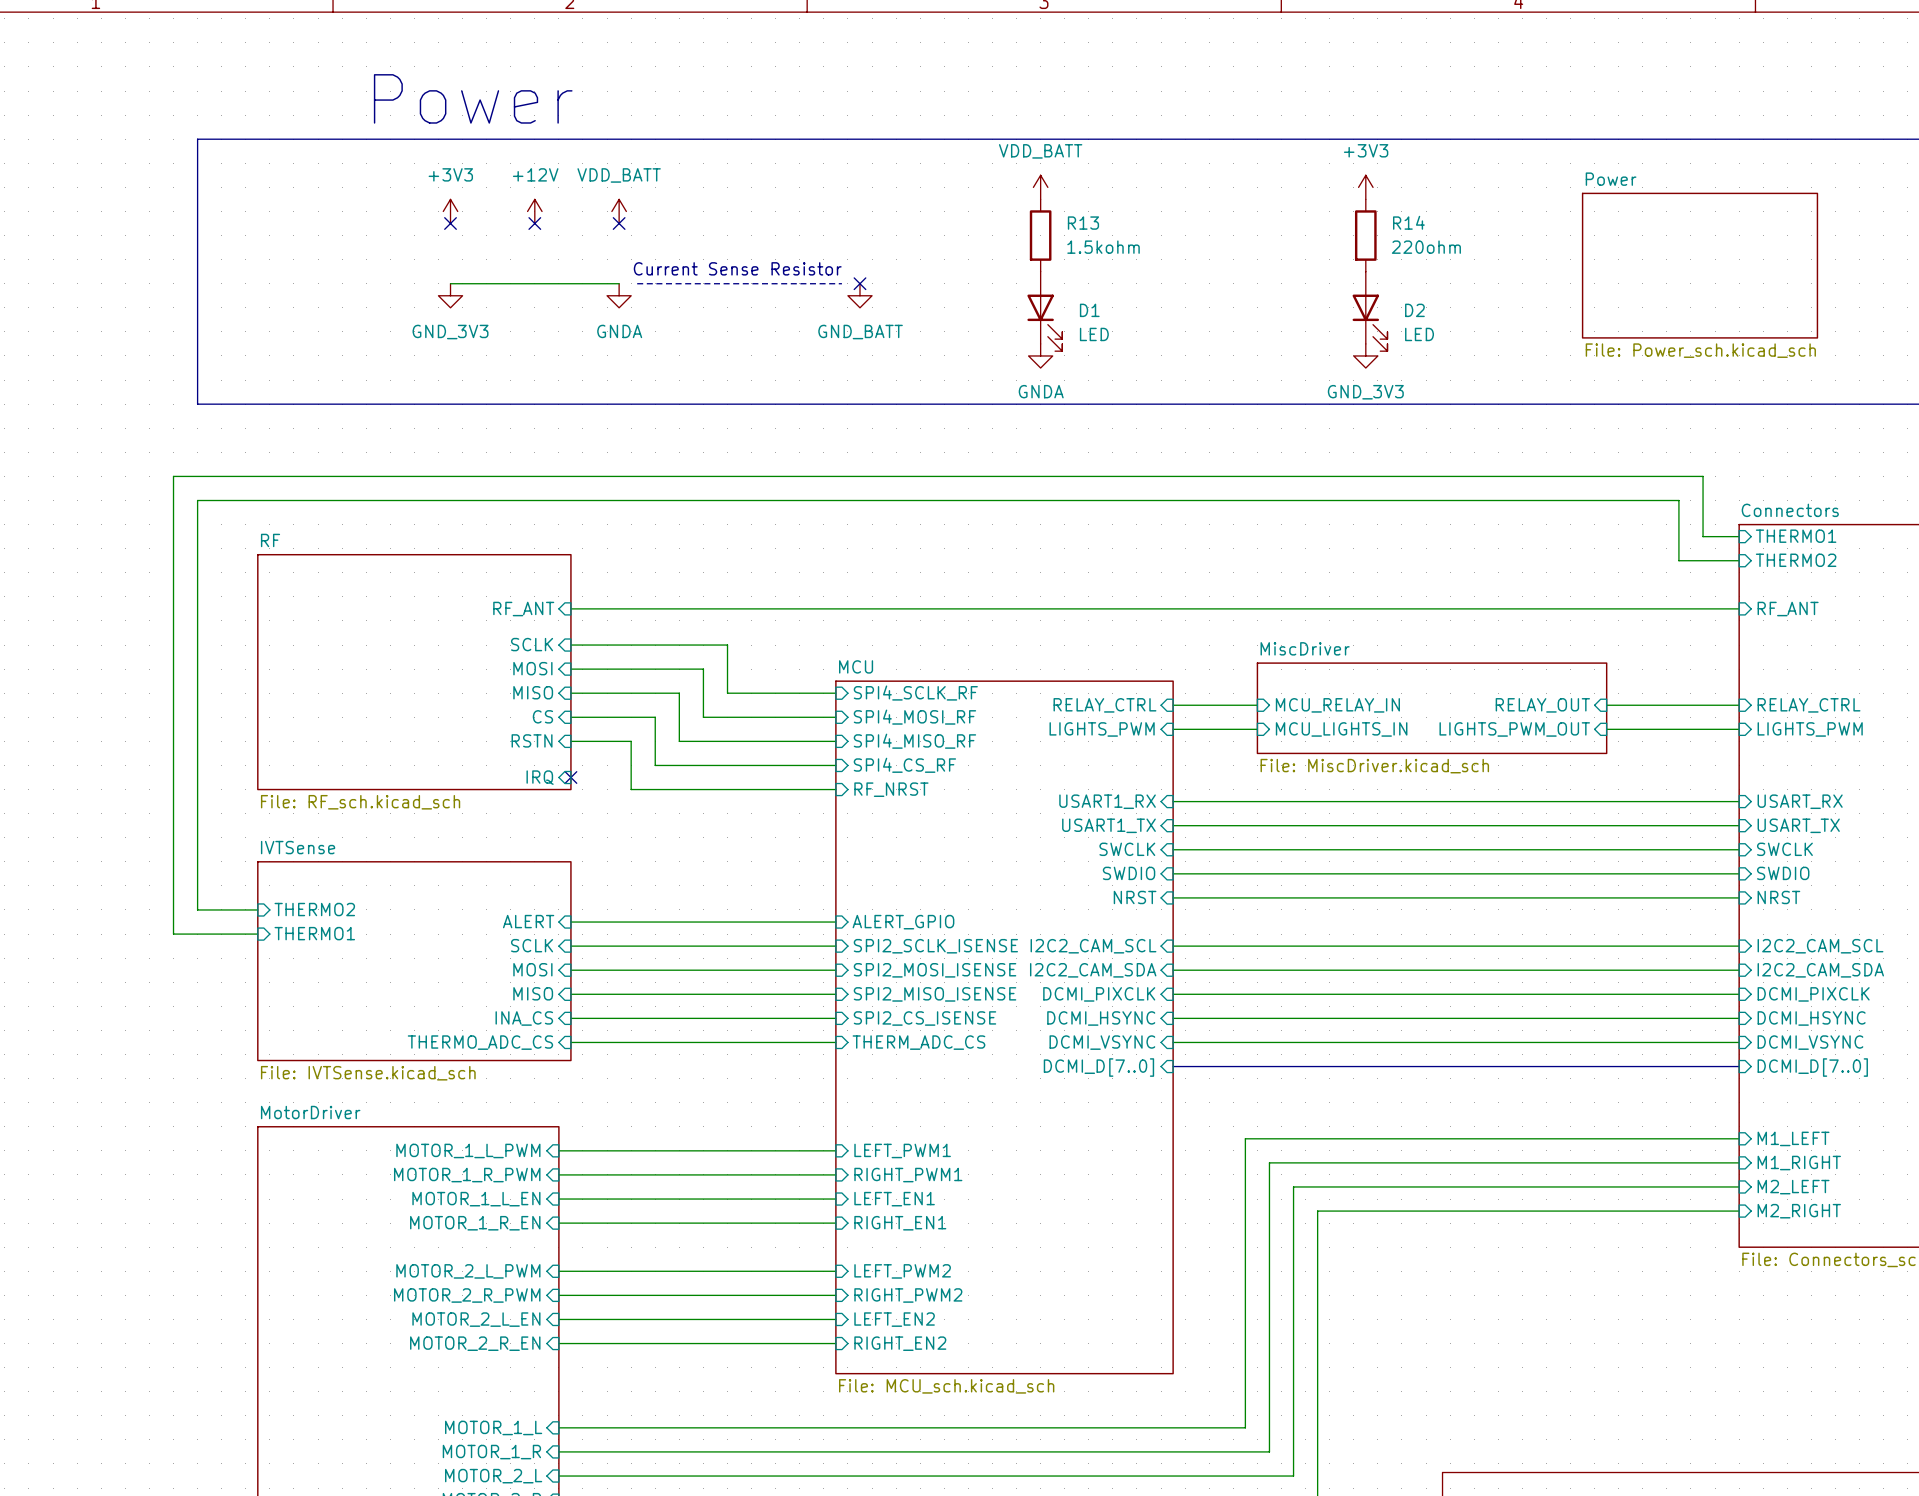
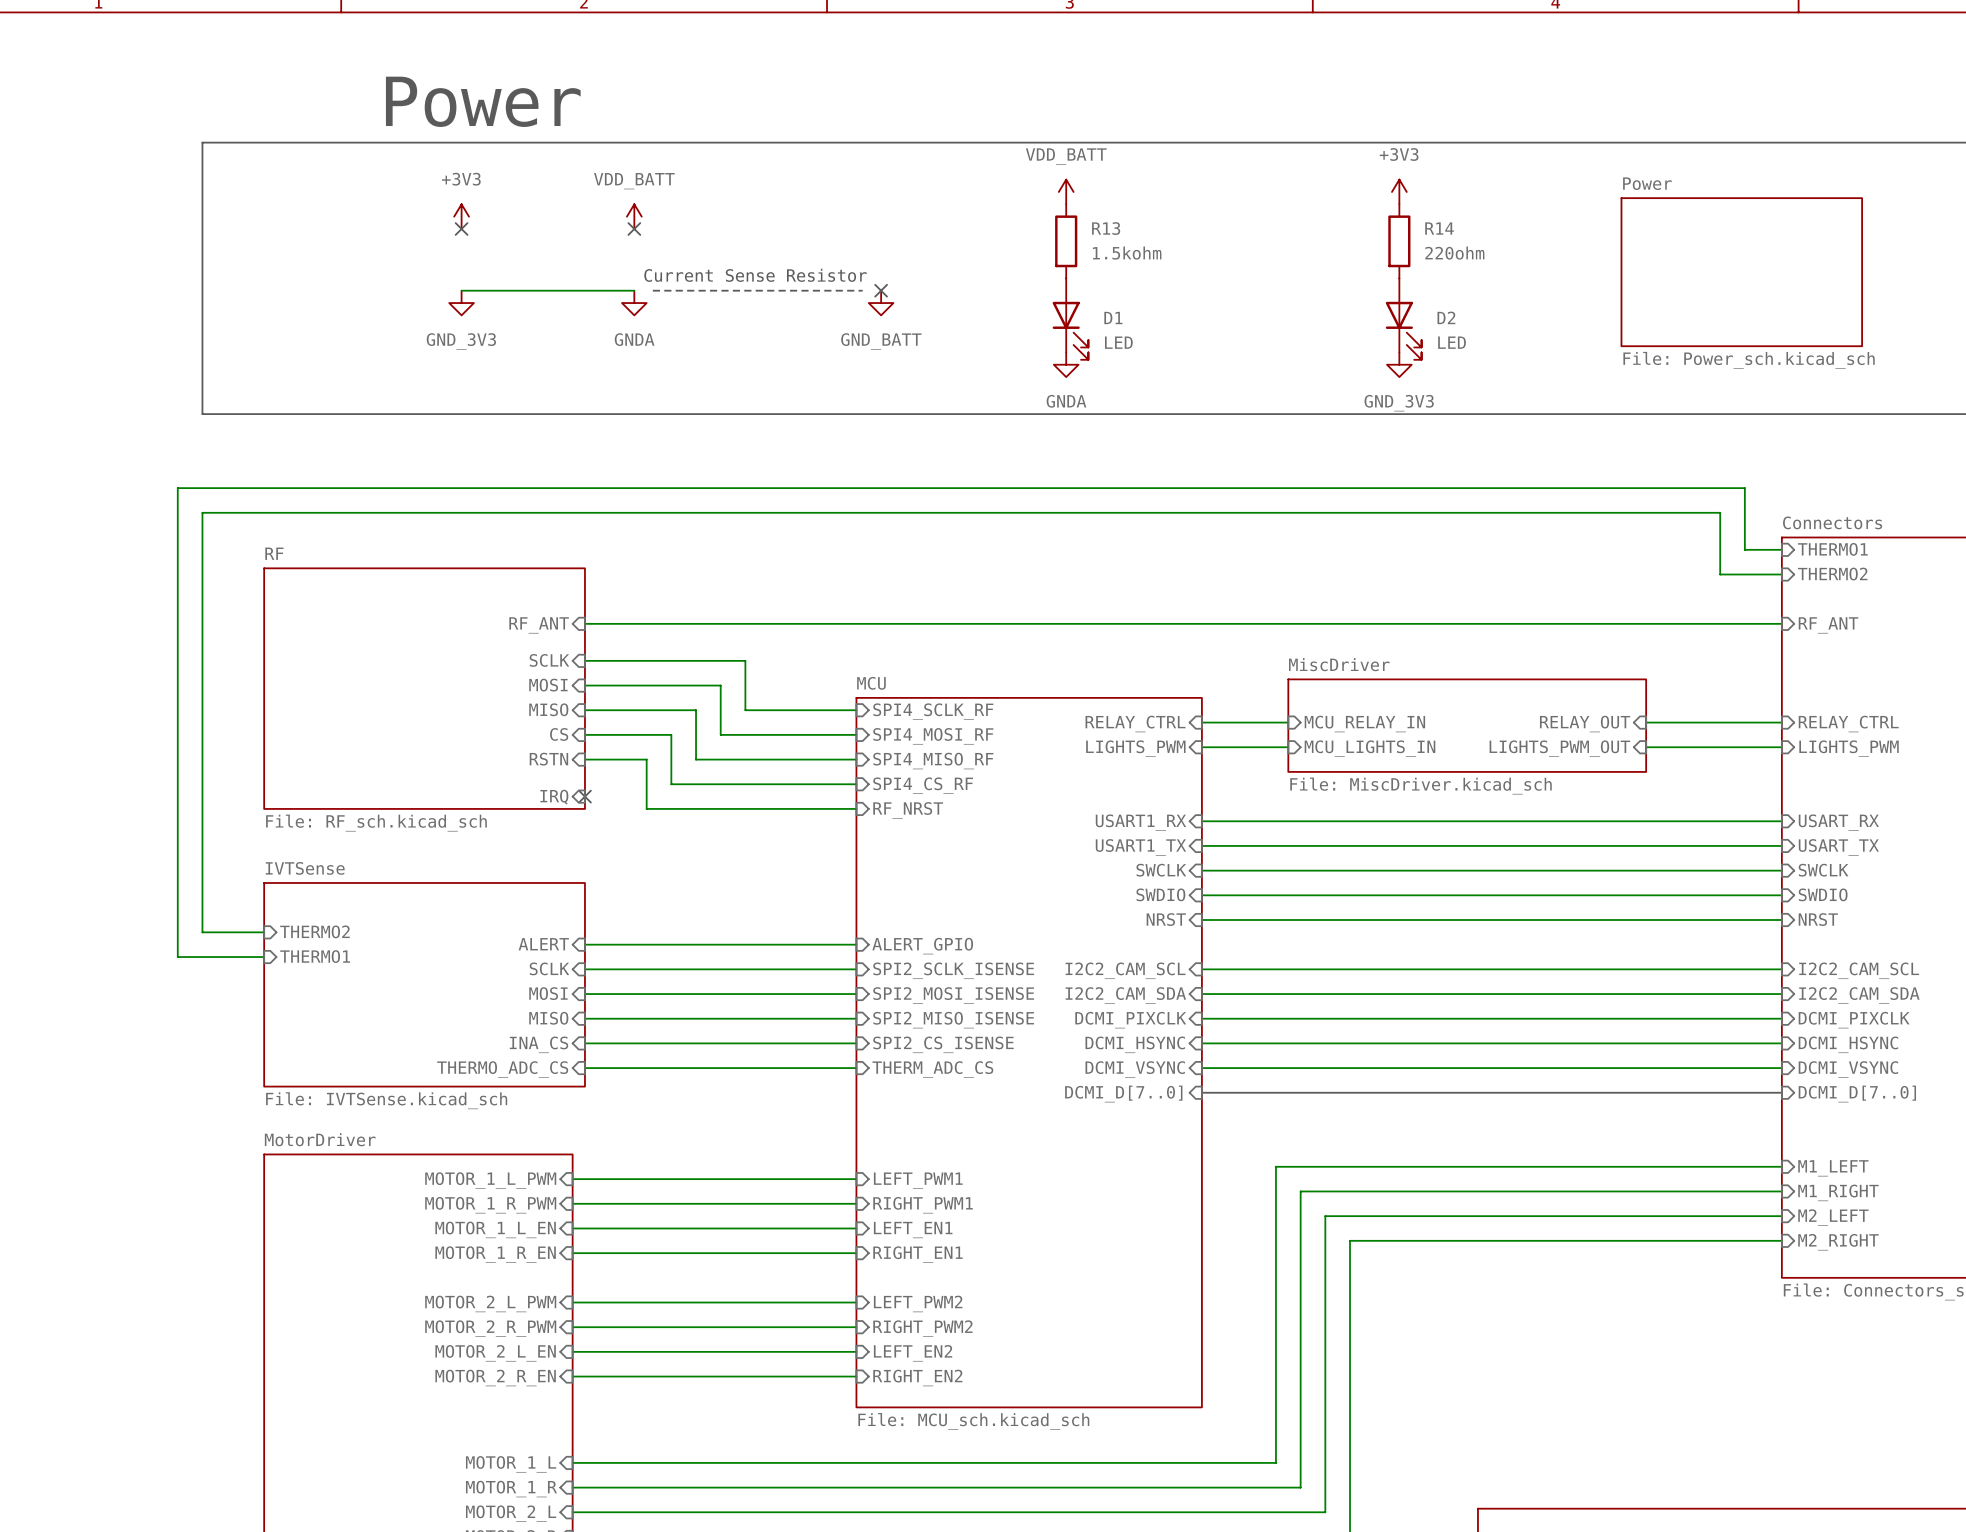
power symbol: +12V (534, 211) -> none
no-connect mark: (534, 223) -> none

